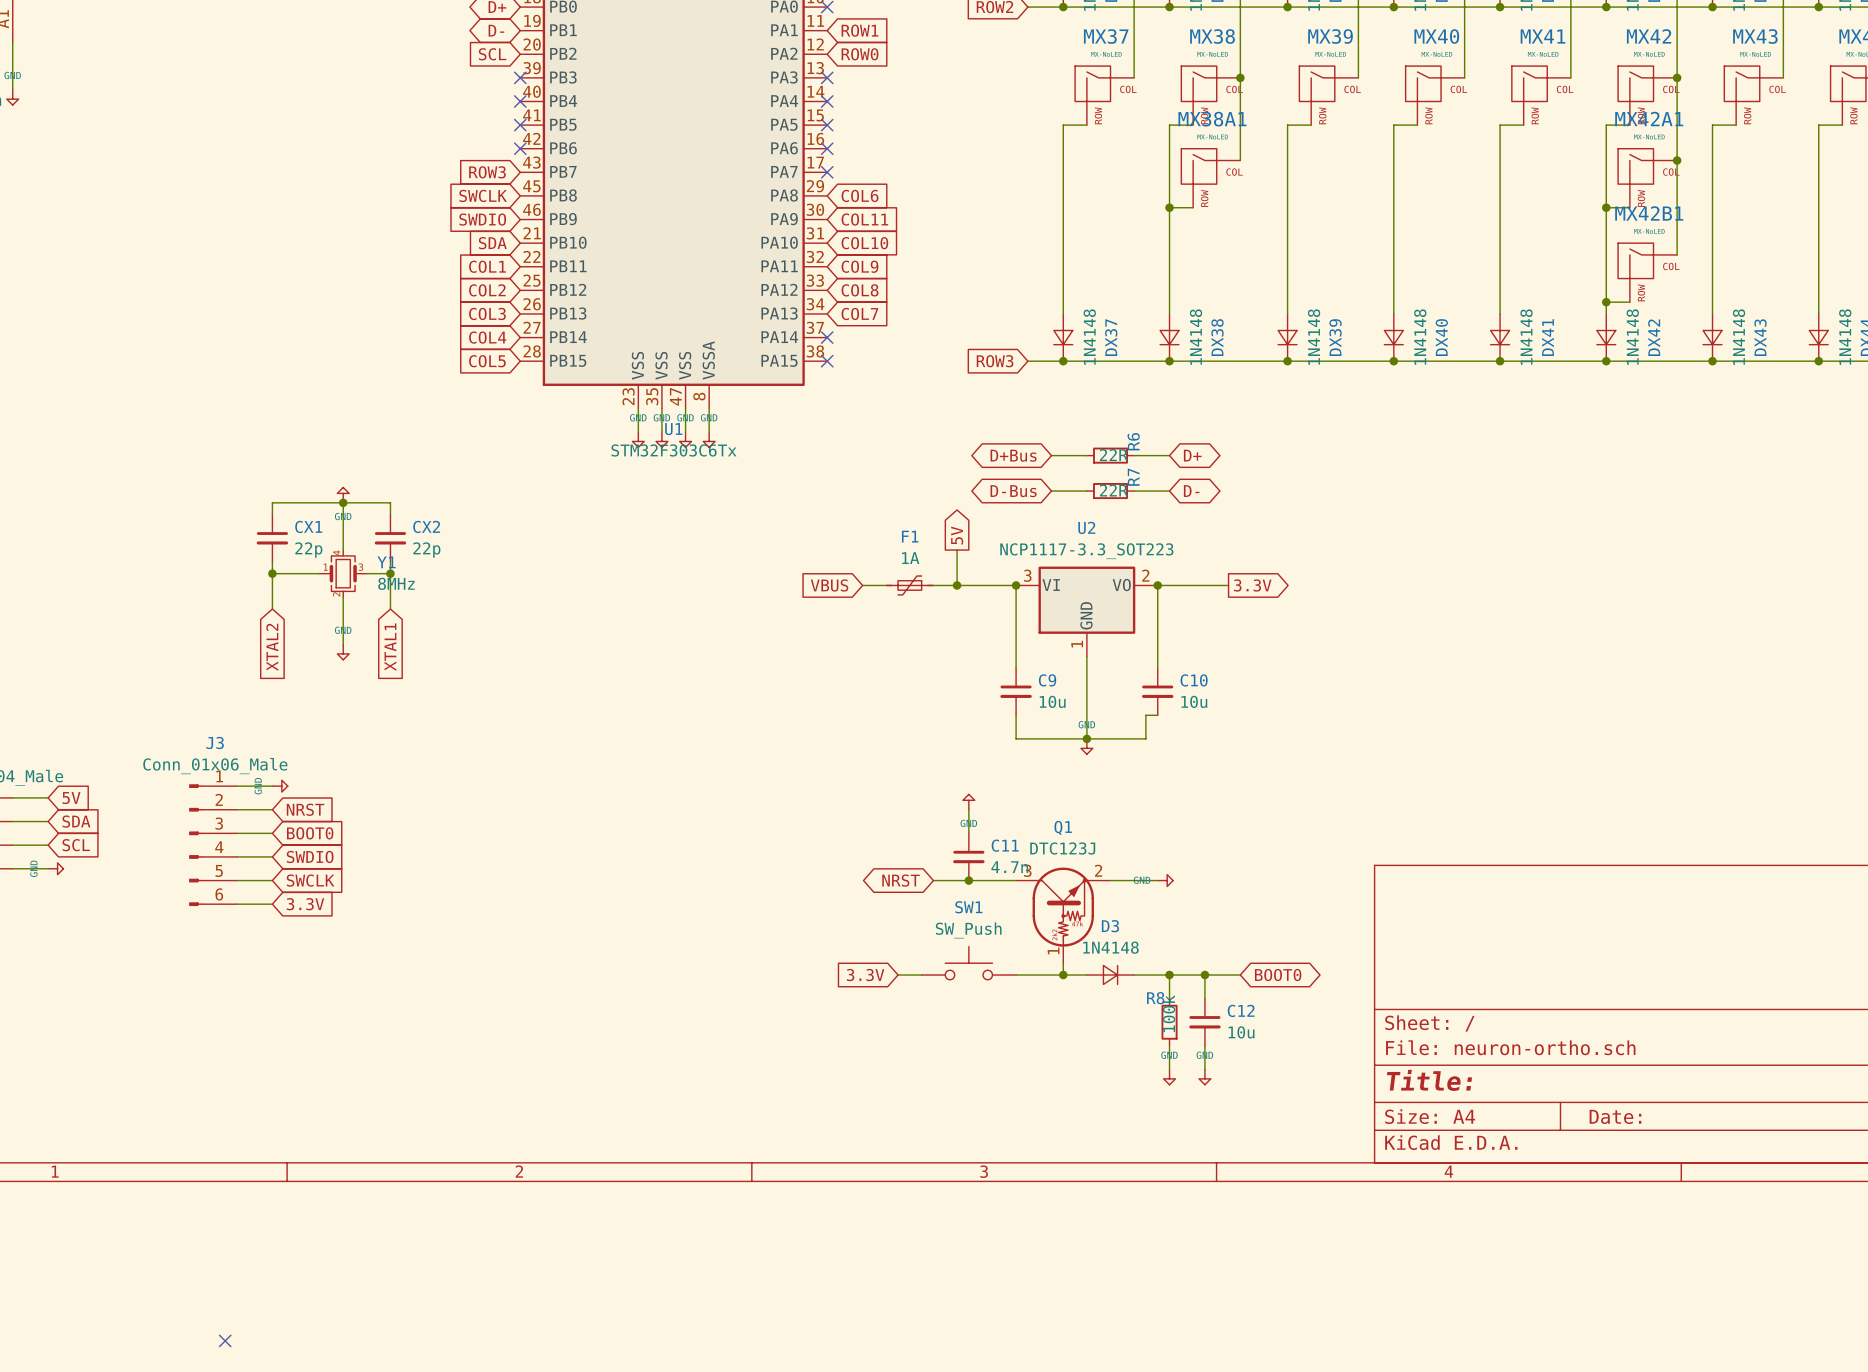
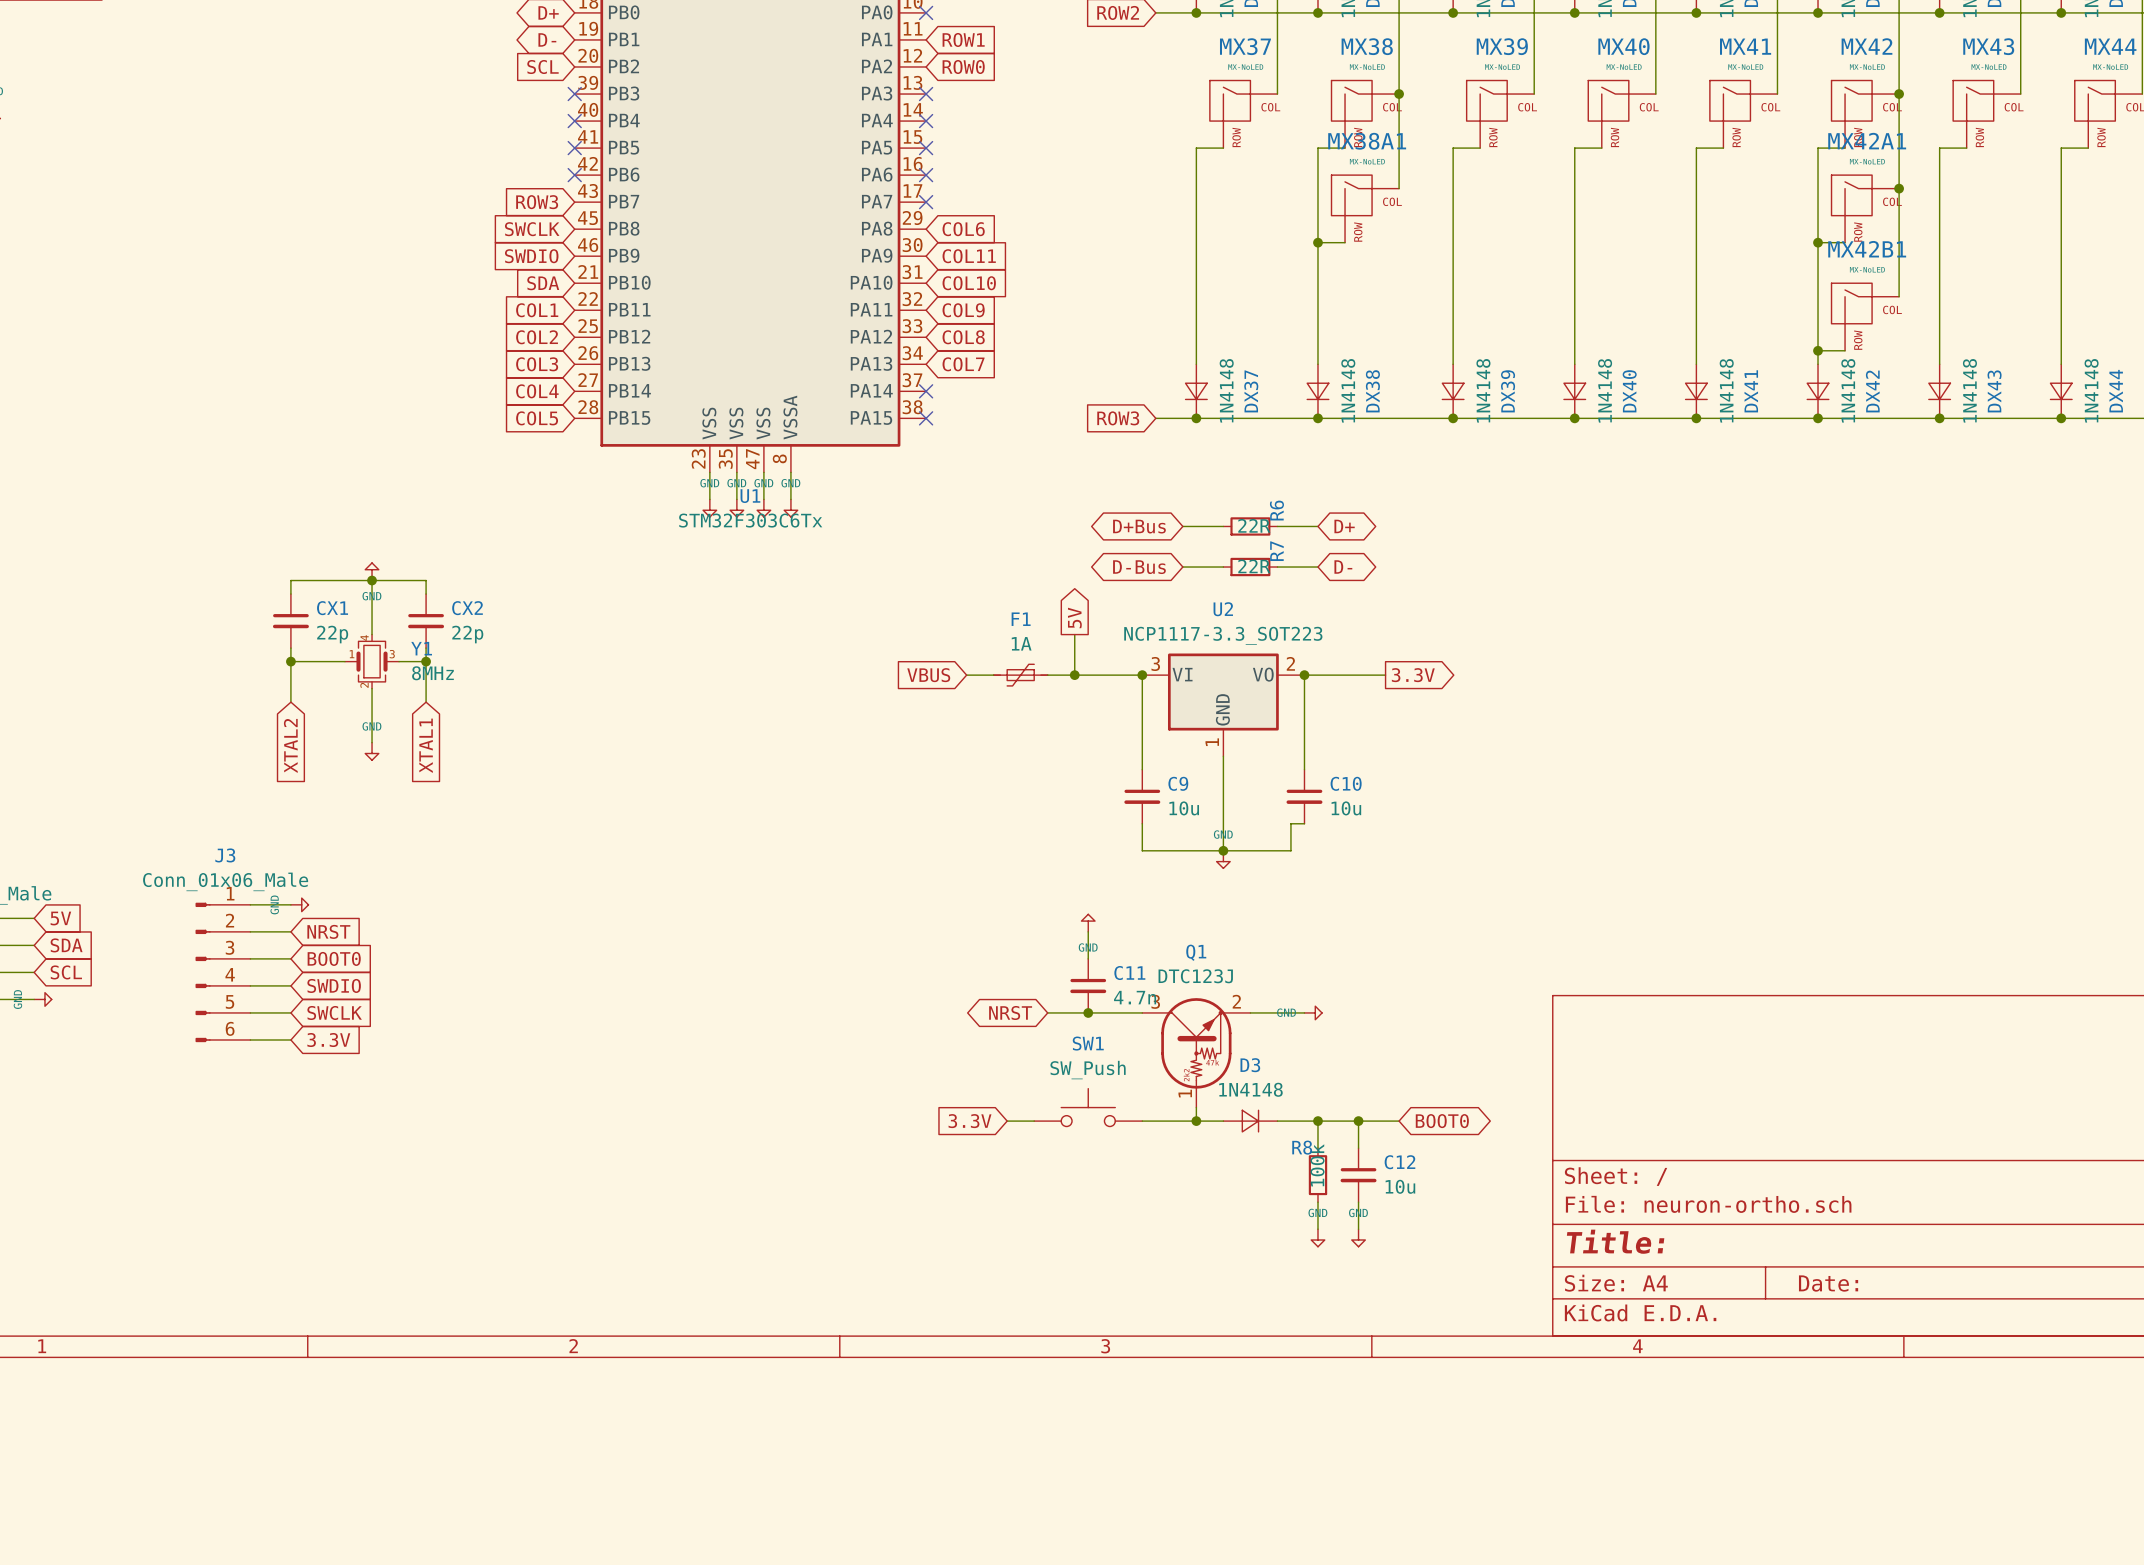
no-connect mark: (225, 1340) -> none

